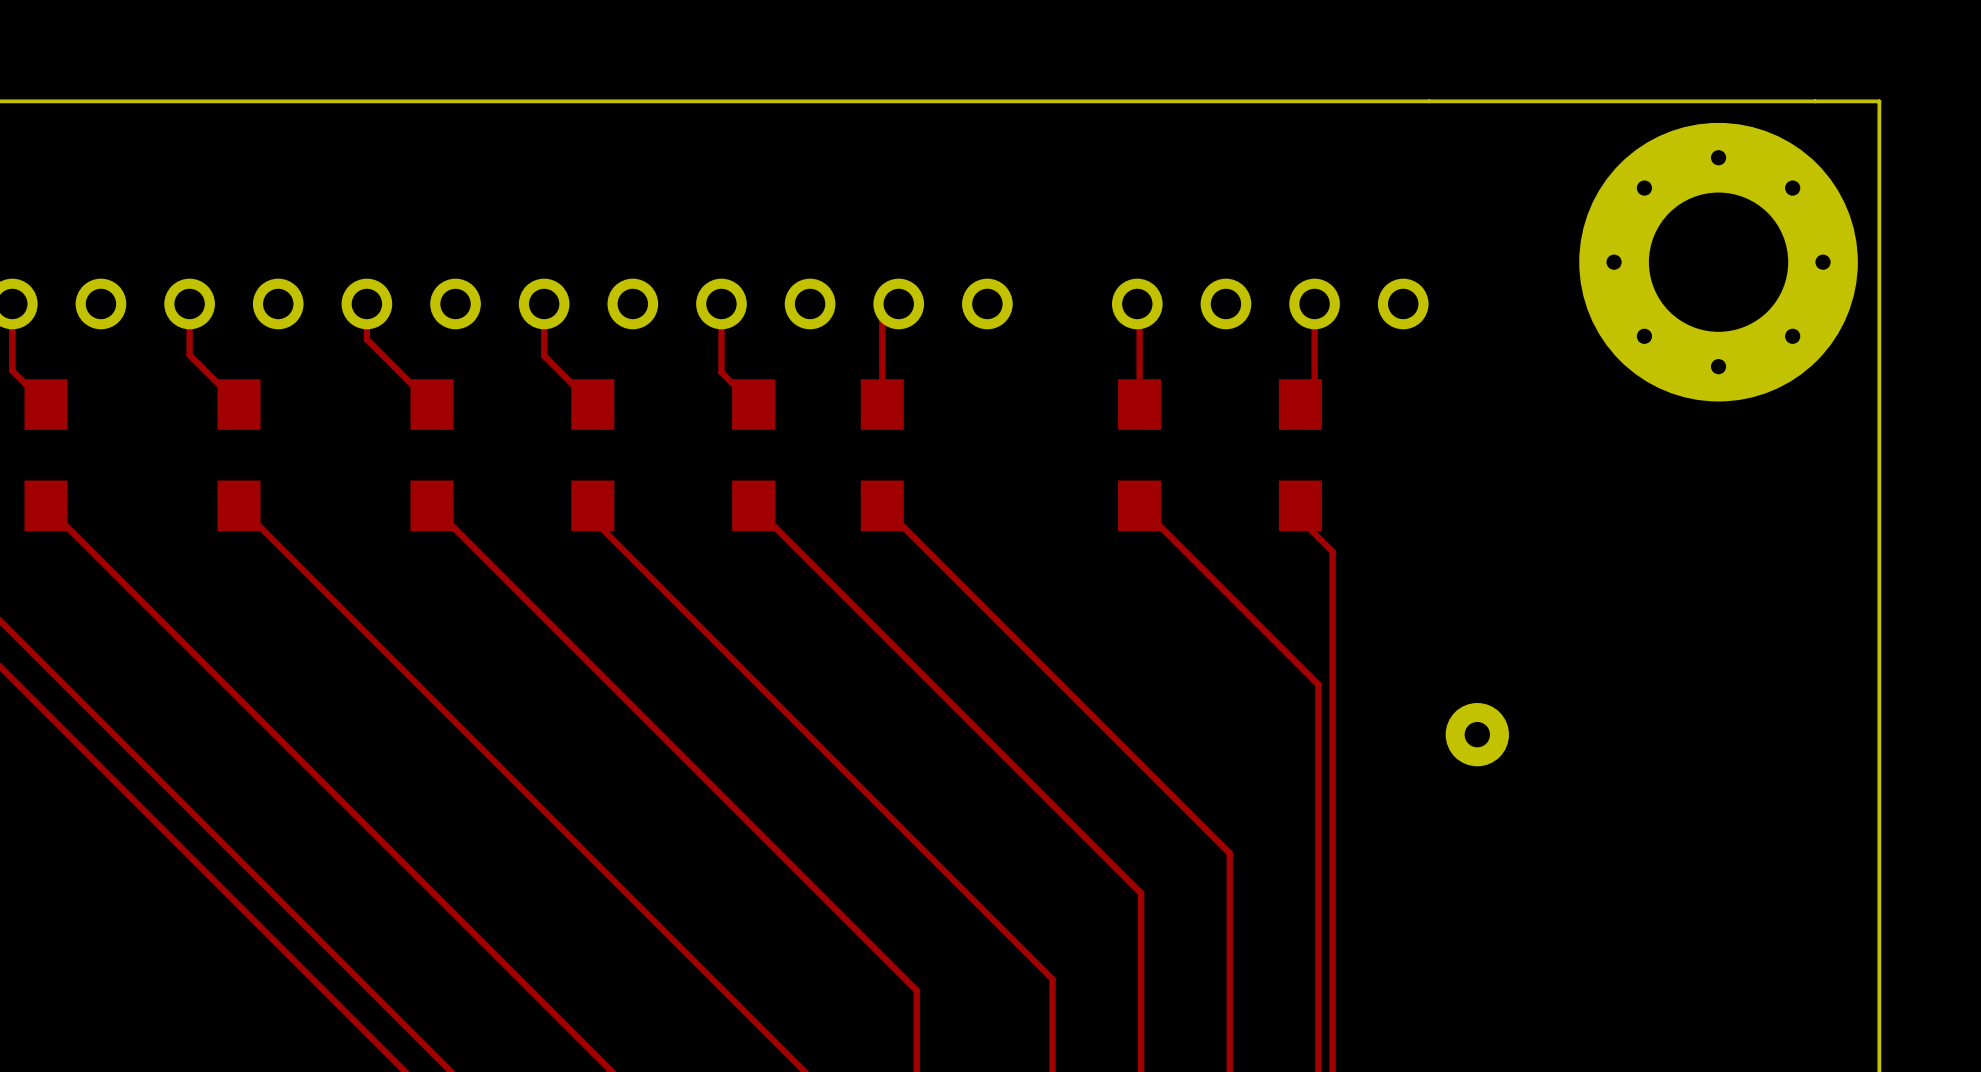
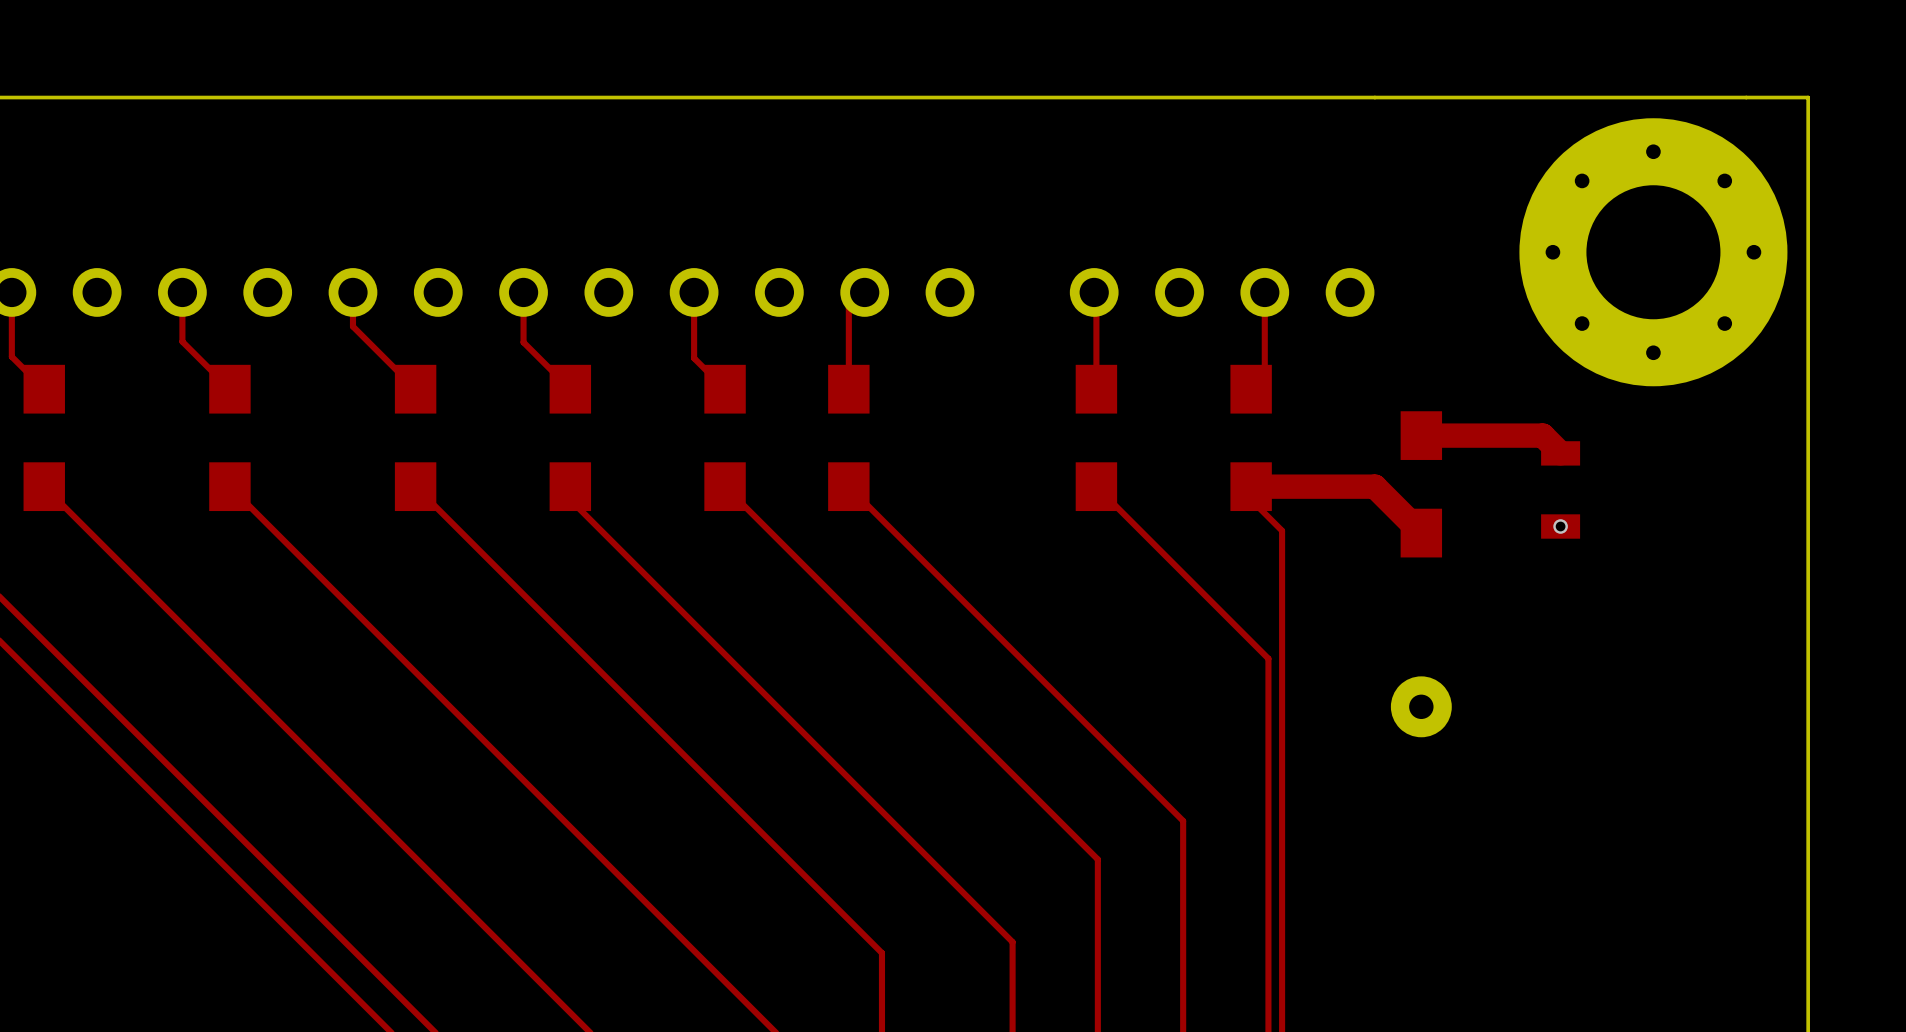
top track: none -> (1421, 435) (1542, 435) (1560, 453)
part: none -> (1421, 484)
top track: none -> (1251, 486) (1374, 486) (1421, 533)
part: none -> (1560, 489)
via: none -> (1560, 526)

